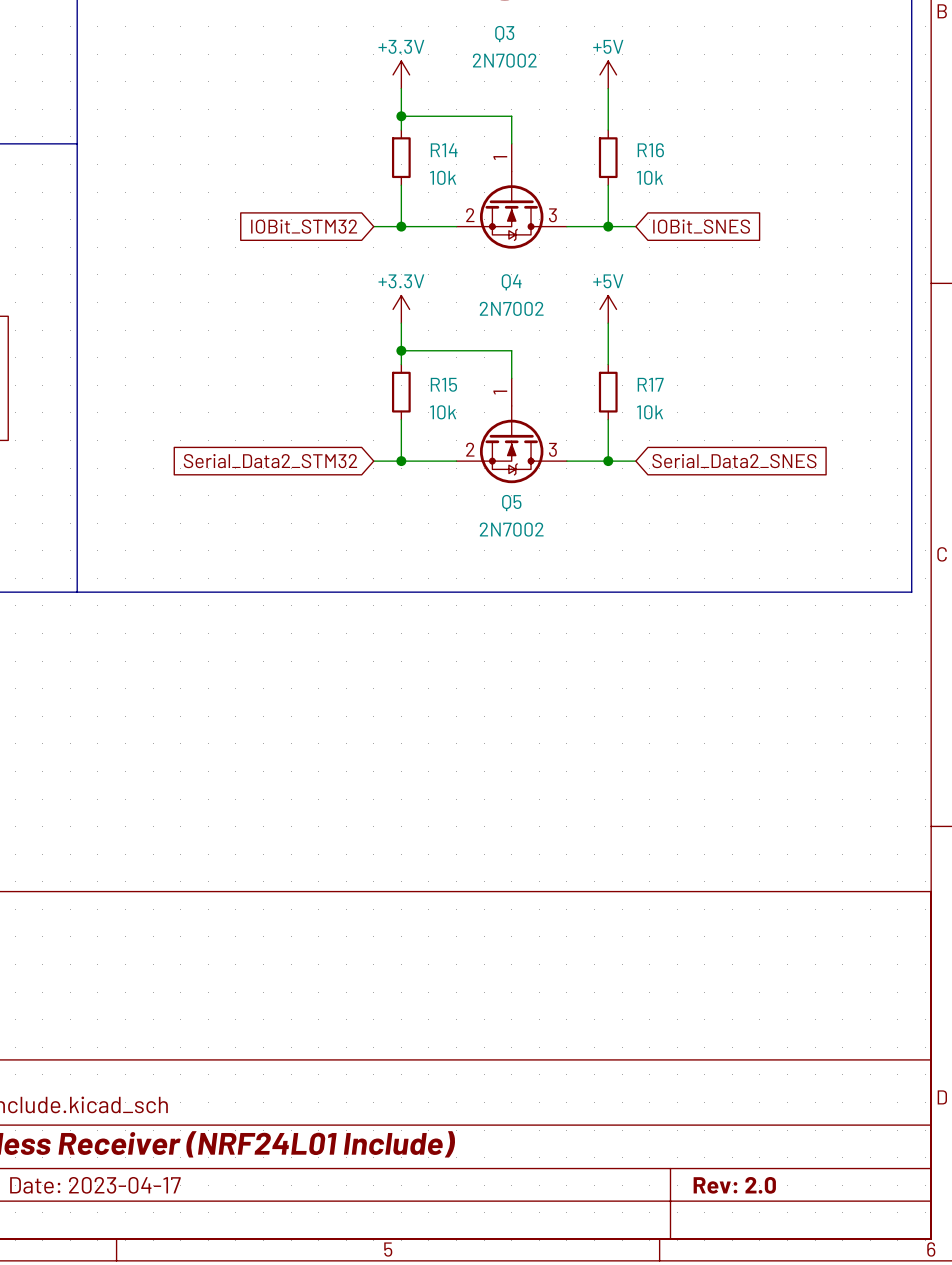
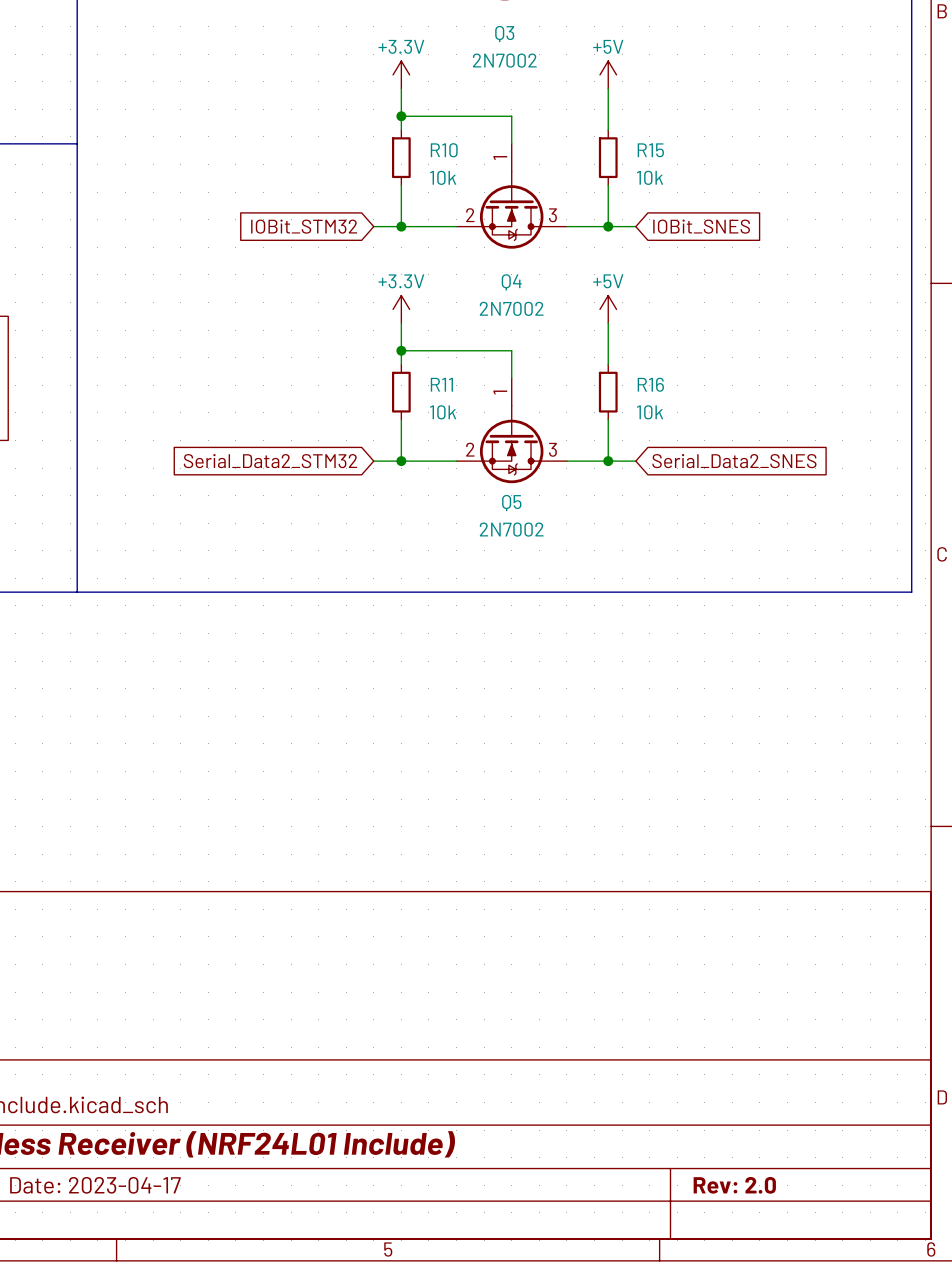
R14 name: R14 (444, 150) -> R10 (444, 150)
R16 name: R16 (650, 150) -> R15 (650, 150)
R15 name: R15 (443, 384) -> R11 (441, 384)
R17 name: R17 (650, 384) -> R16 (650, 384)

